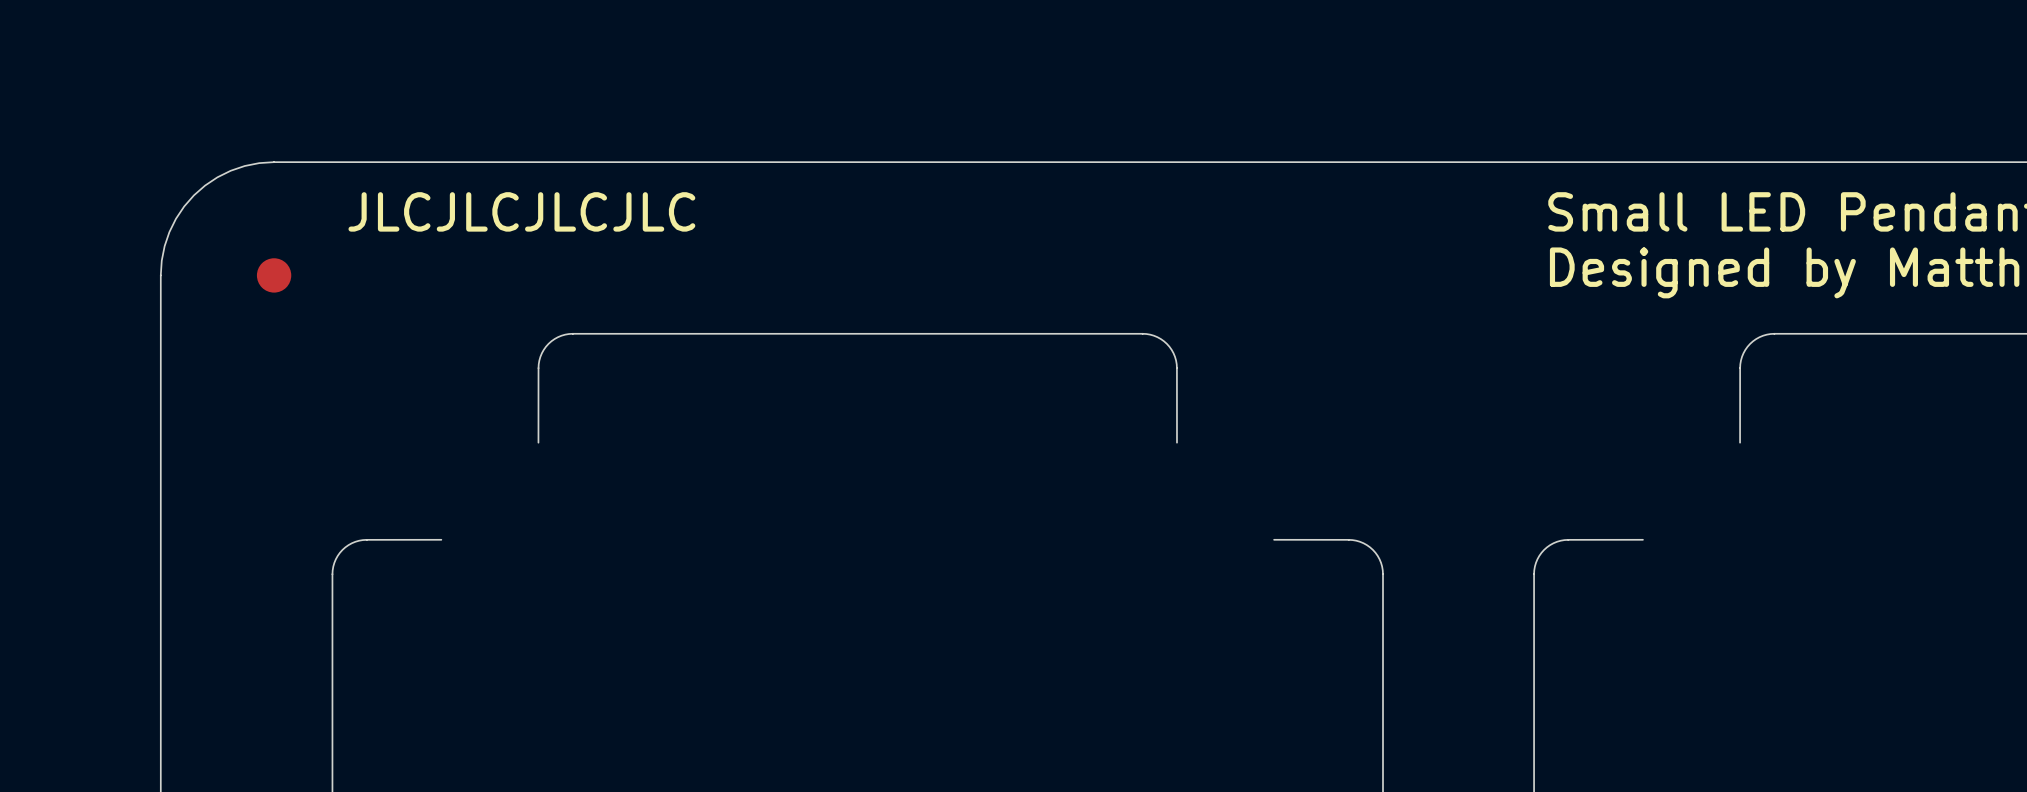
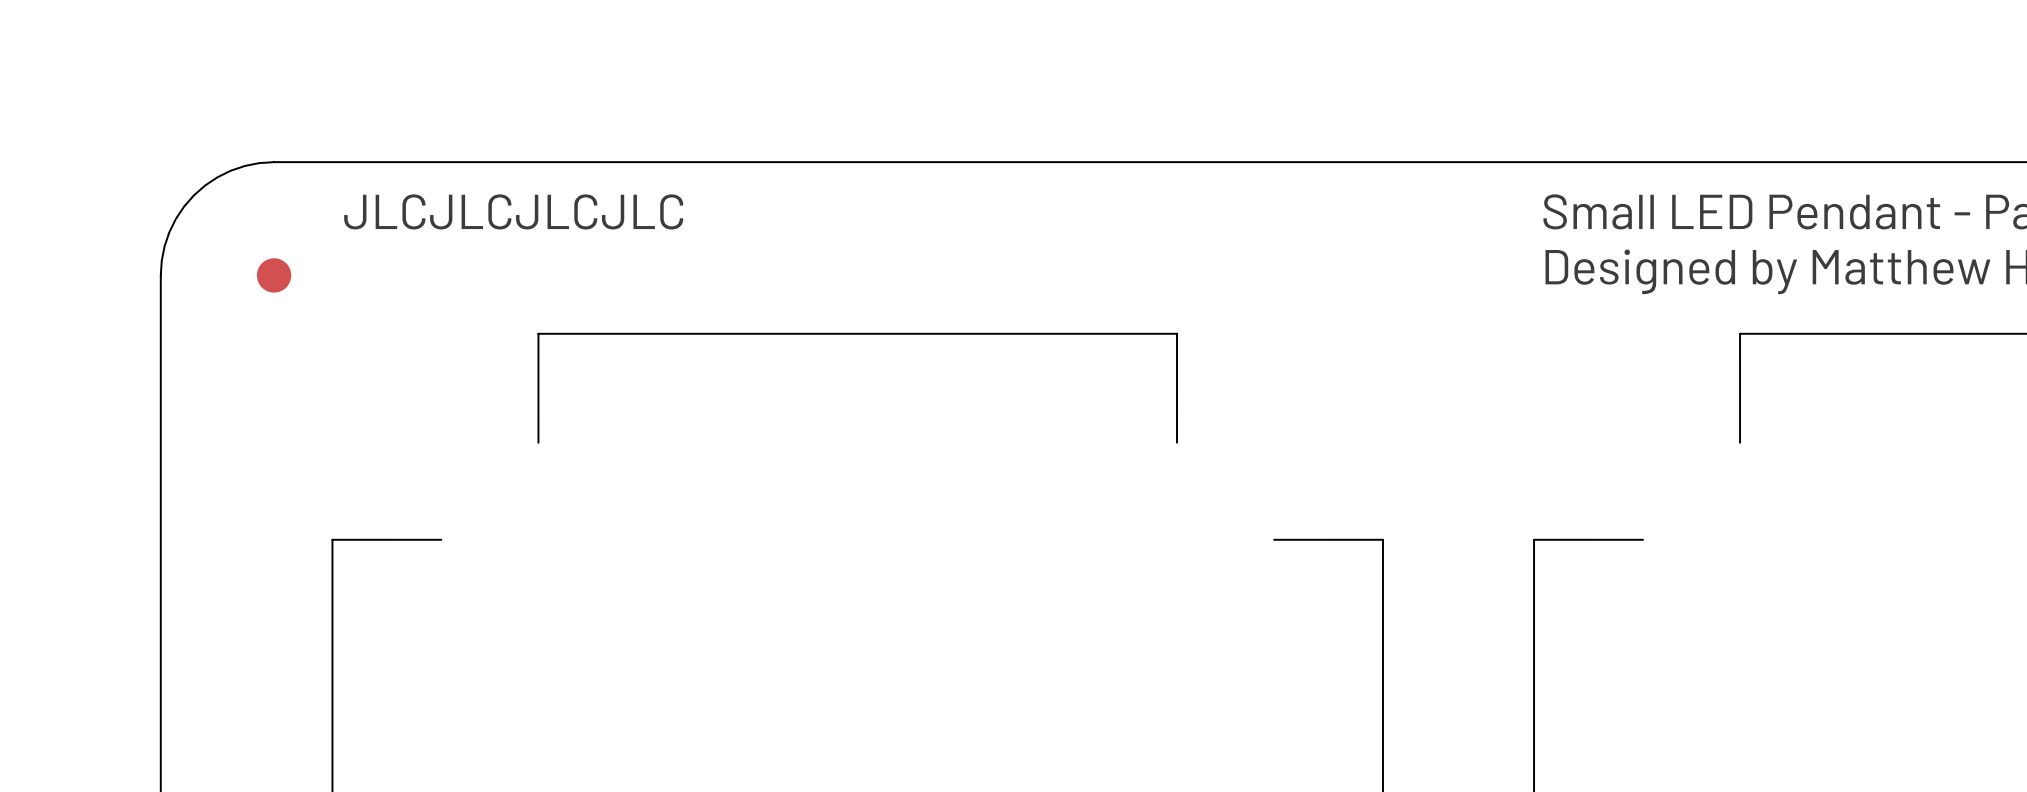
board edge: (572, 333) (561, 335) (551, 341) (540, 356) (538, 368) (538, 442) -> (572, 333) (538, 333) (538, 442)
board edge: (1142, 333) (1153, 335) (1164, 341) (1175, 356) (1176, 368) (1176, 442) -> (1142, 333) (1177, 333) (1176, 442)
board edge: (1774, 333) (1763, 335) (1753, 341) (1742, 356) (1740, 368) (1740, 442) -> (1774, 333) (1740, 333) (1740, 442)
board edge: (441, 539) (366, 539) (355, 541) (339, 552) (334, 562) (332, 574) -> (441, 539) (332, 539) (332, 574)
board edge: (1274, 539) (1348, 539) (1360, 541) (1375, 552) (1381, 562) (1382, 574) -> (1274, 539) (1382, 539) (1382, 574)
board edge: (1642, 539) (1568, 539) (1557, 541) (1541, 552) (1535, 562) (1534, 574) -> (1642, 539) (1534, 539) (1534, 574)

